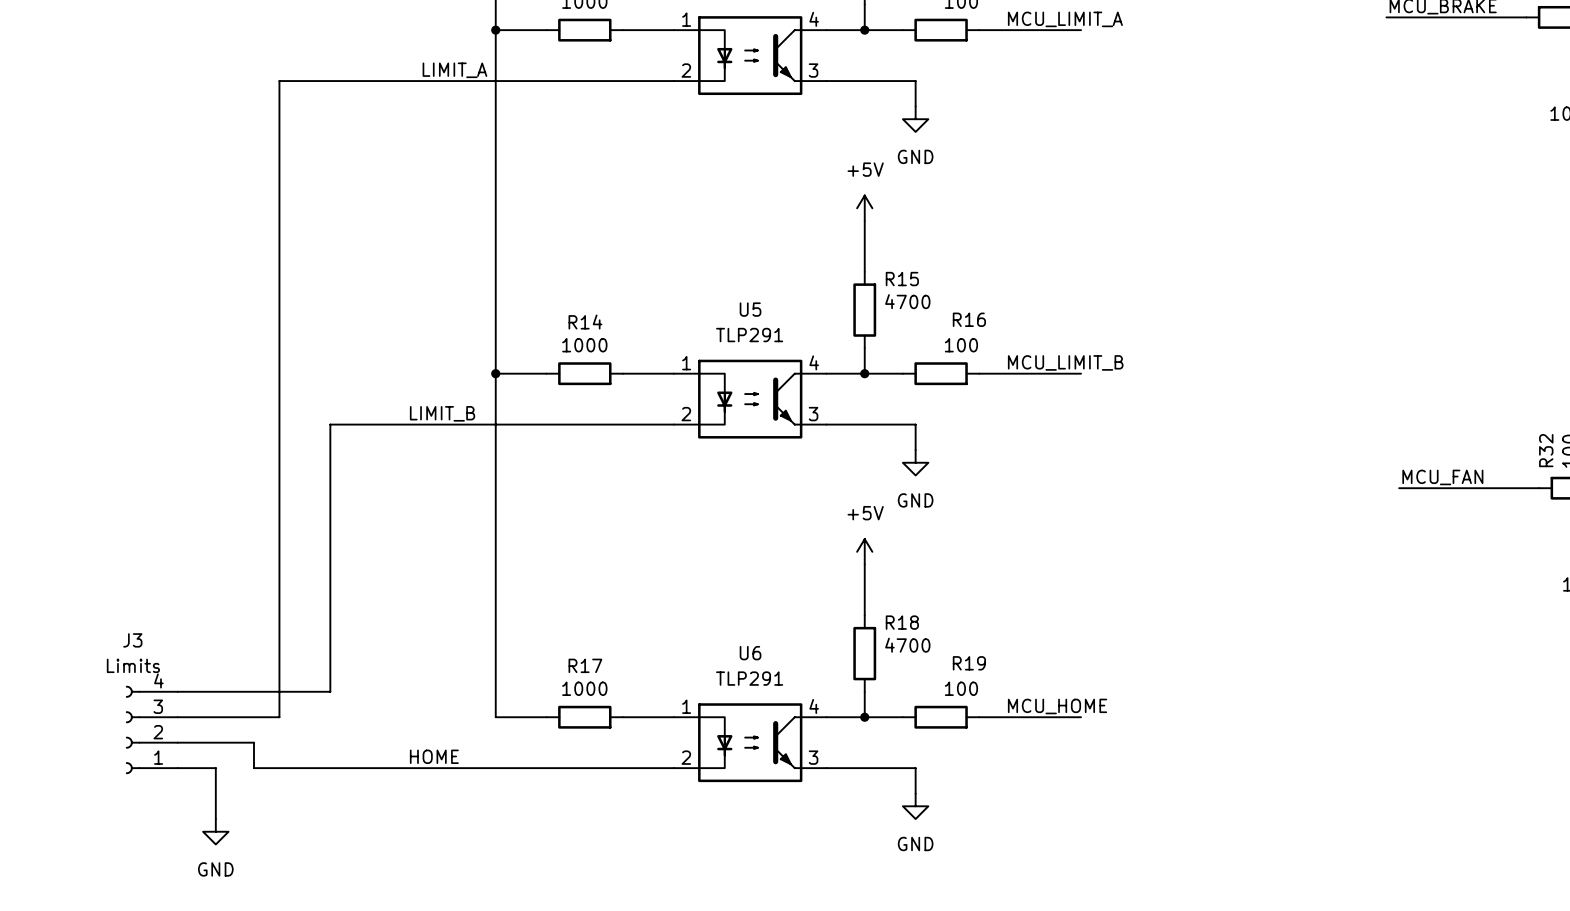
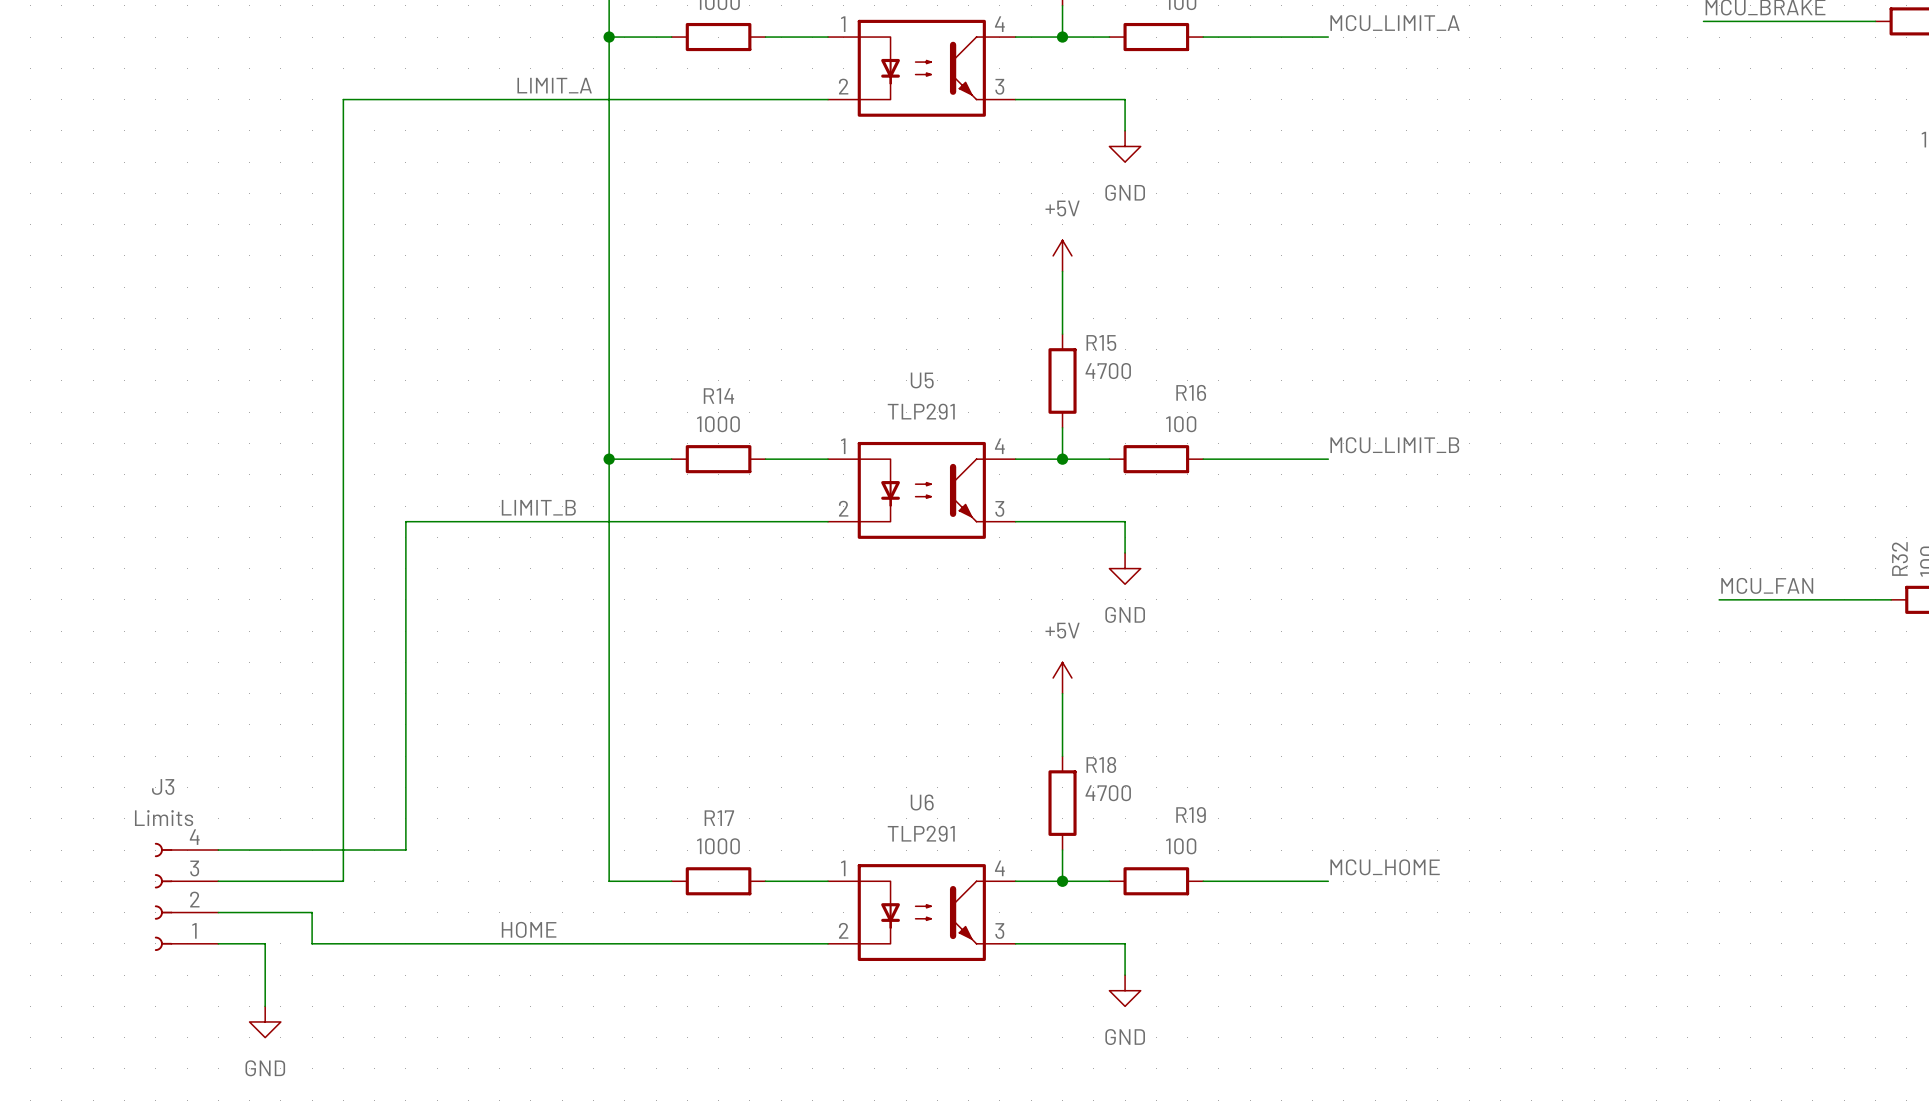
label position: MCU_LIMIT_A (1065, 19) -> MCU_LIMIT_A (1395, 23)
label position: MCU_LIMIT_B (1065, 362) -> MCU_LIMIT_B (1394, 445)
label position: MCU_HOME (1057, 706) -> MCU_HOME (1385, 867)

